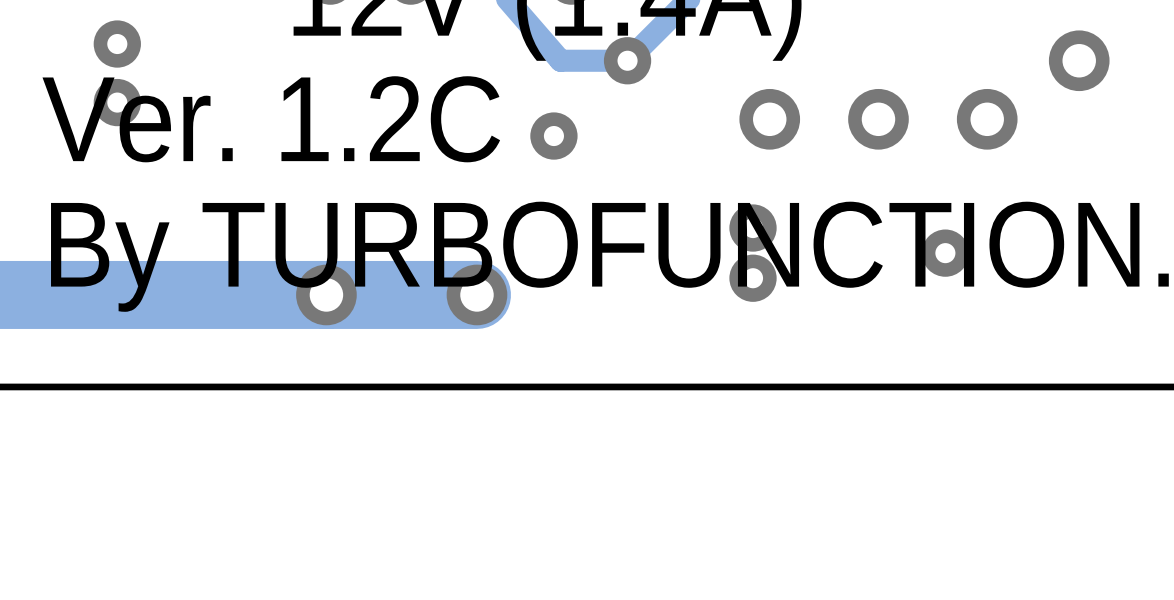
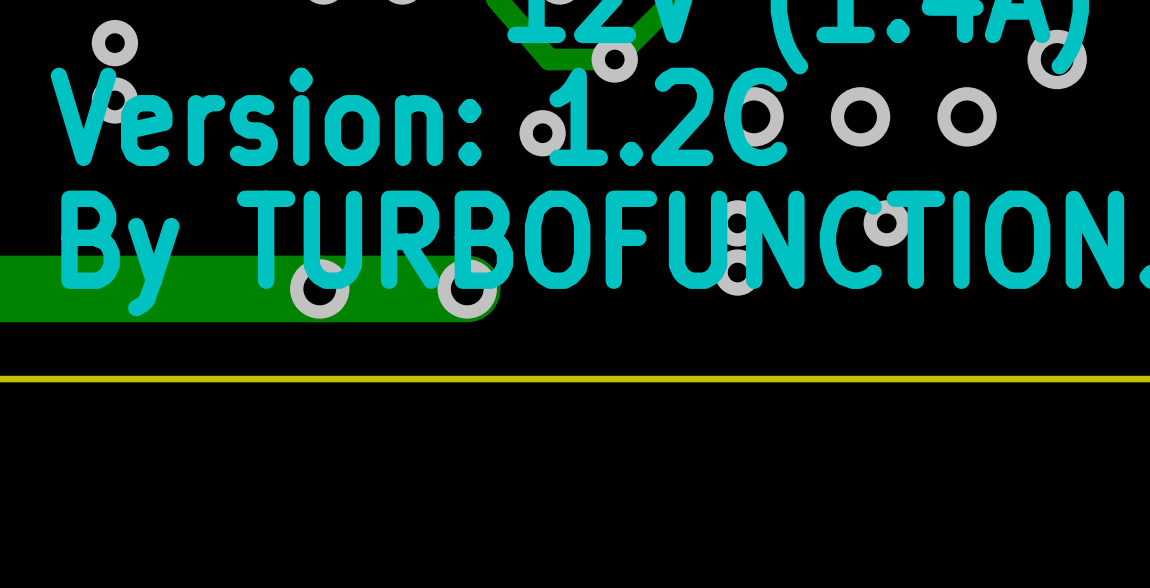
text: Ver. 1.2C (271, 119) -> Version: 1.2C (418, 116)
via position: (945, 253) -> (886, 223)

